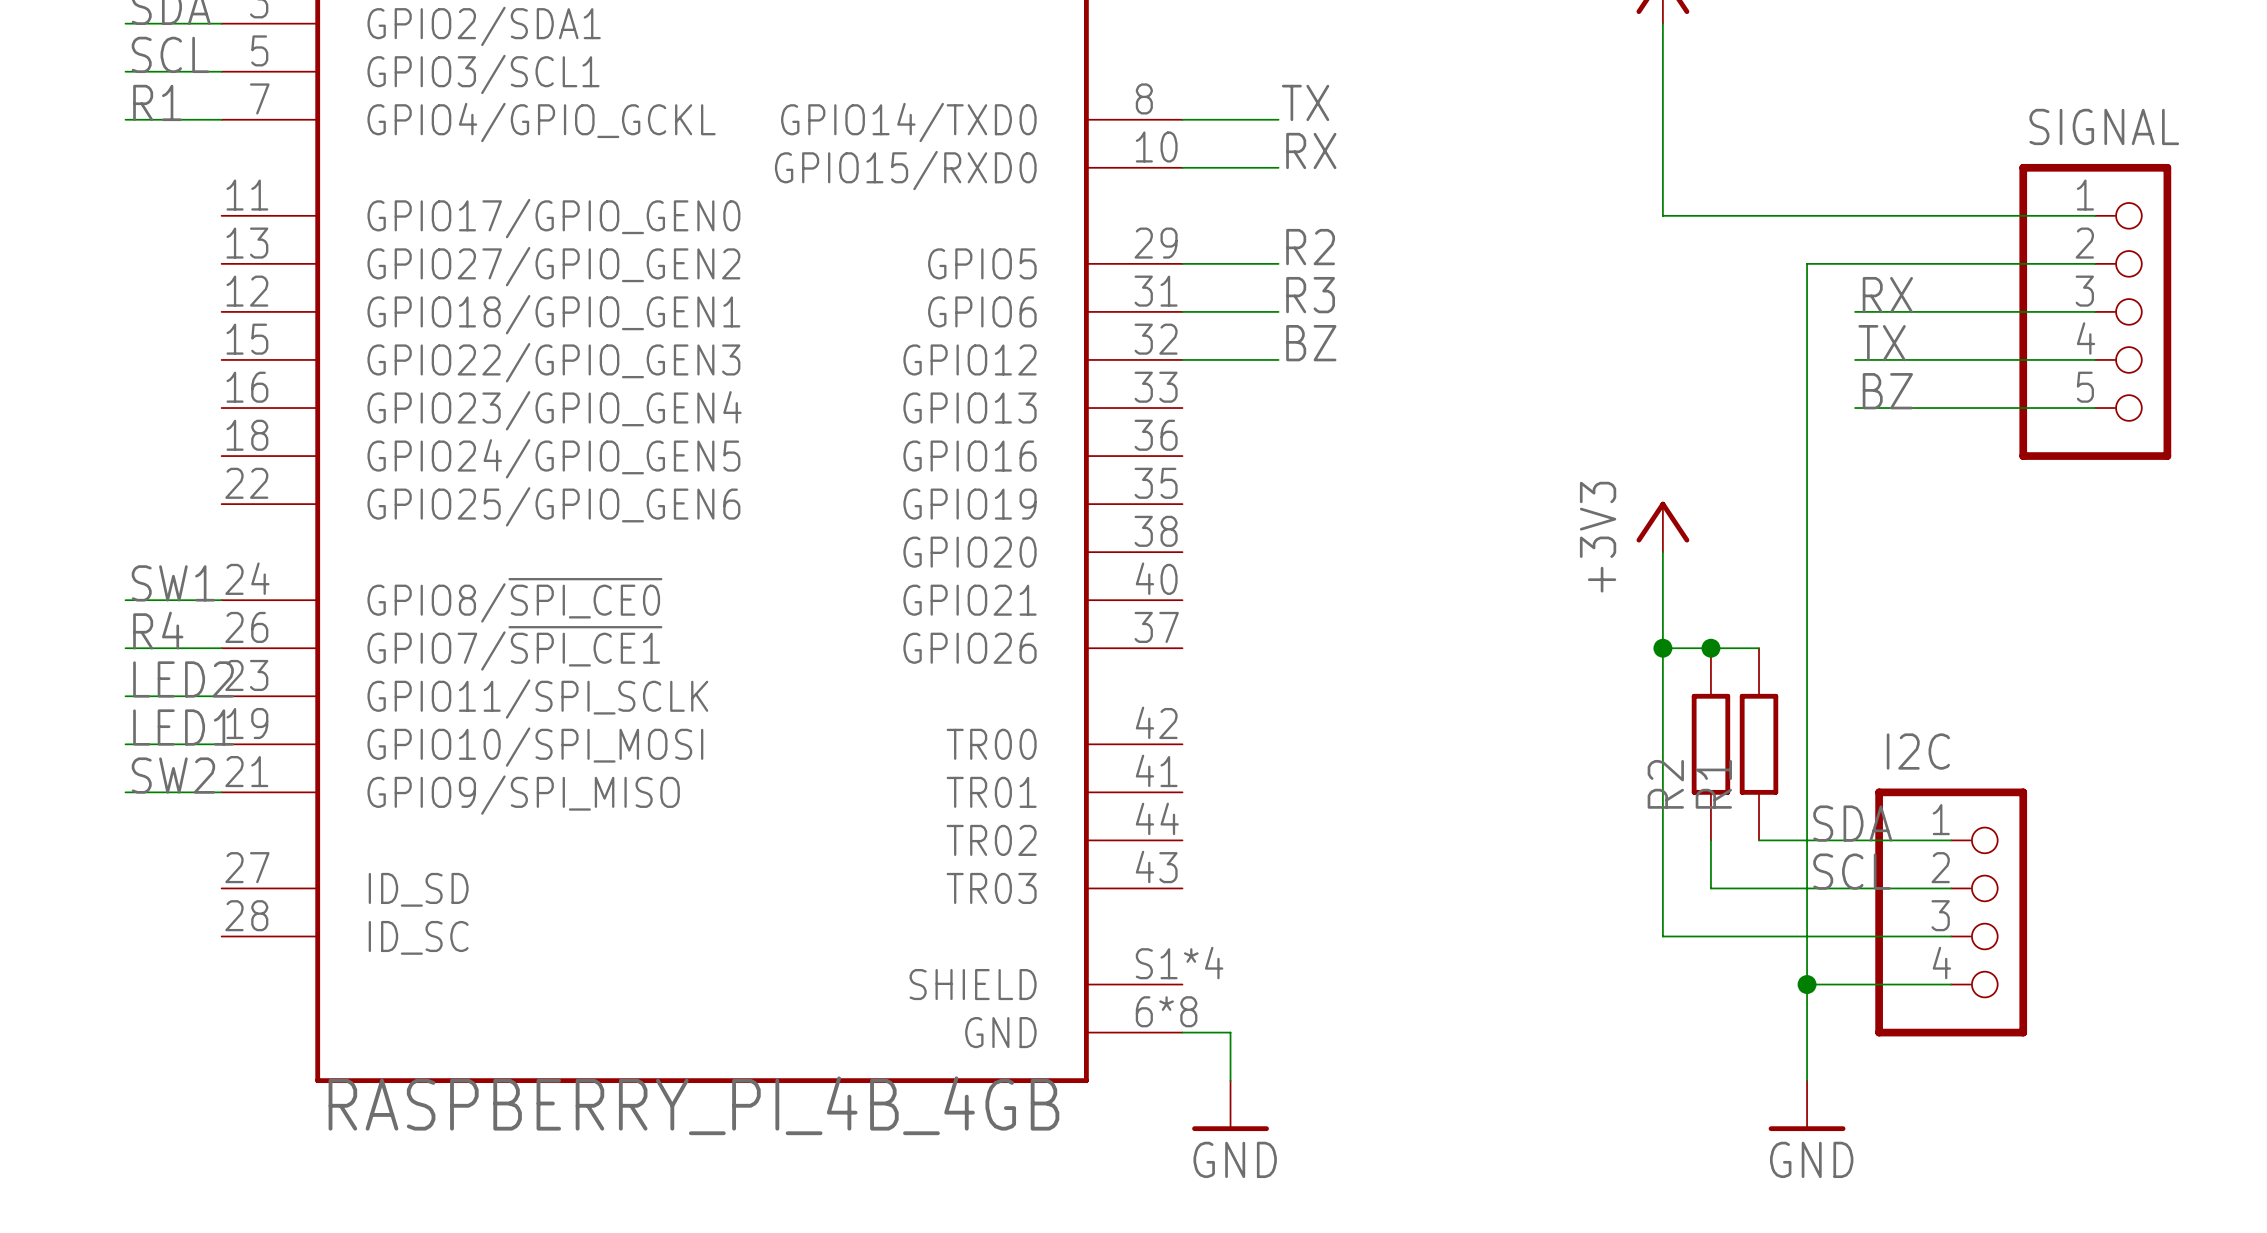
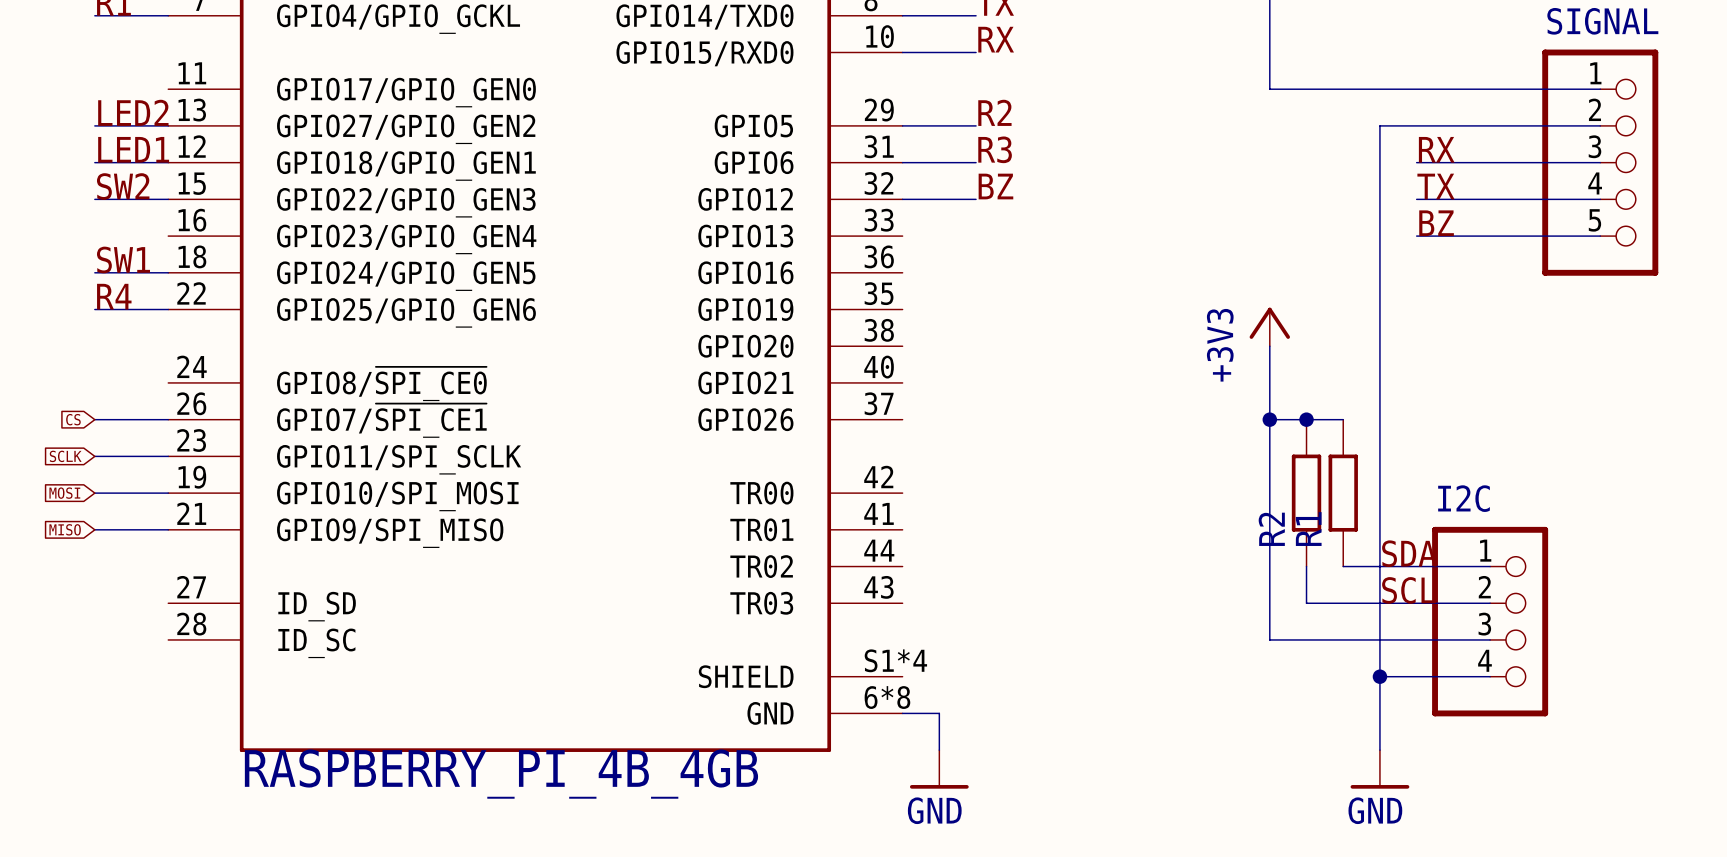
wire: none -> (94, 125) (168, 125)
wire: none -> (94, 162) (168, 162)
wire: none -> (94, 199) (168, 199)
wire: none -> (94, 272) (168, 272)
label position: SW1 (173, 583) -> SW1 (123, 259)
wire: (125, 600) (221, 600) -> (94, 309) (168, 309)
label position: R4 (158, 630) -> R4 (114, 296)
global label: none -> CS (73, 419)
label position: LED2 (183, 679) -> LED2 (133, 112)
global label: none -> SCLK (65, 456)
label position: LED1 (183, 727) -> LED1 (133, 149)
global label: none -> MOSI (64, 493)
label position: SW2 (173, 775) -> SW2 (123, 186)
global label: none -> MISO (65, 529)

